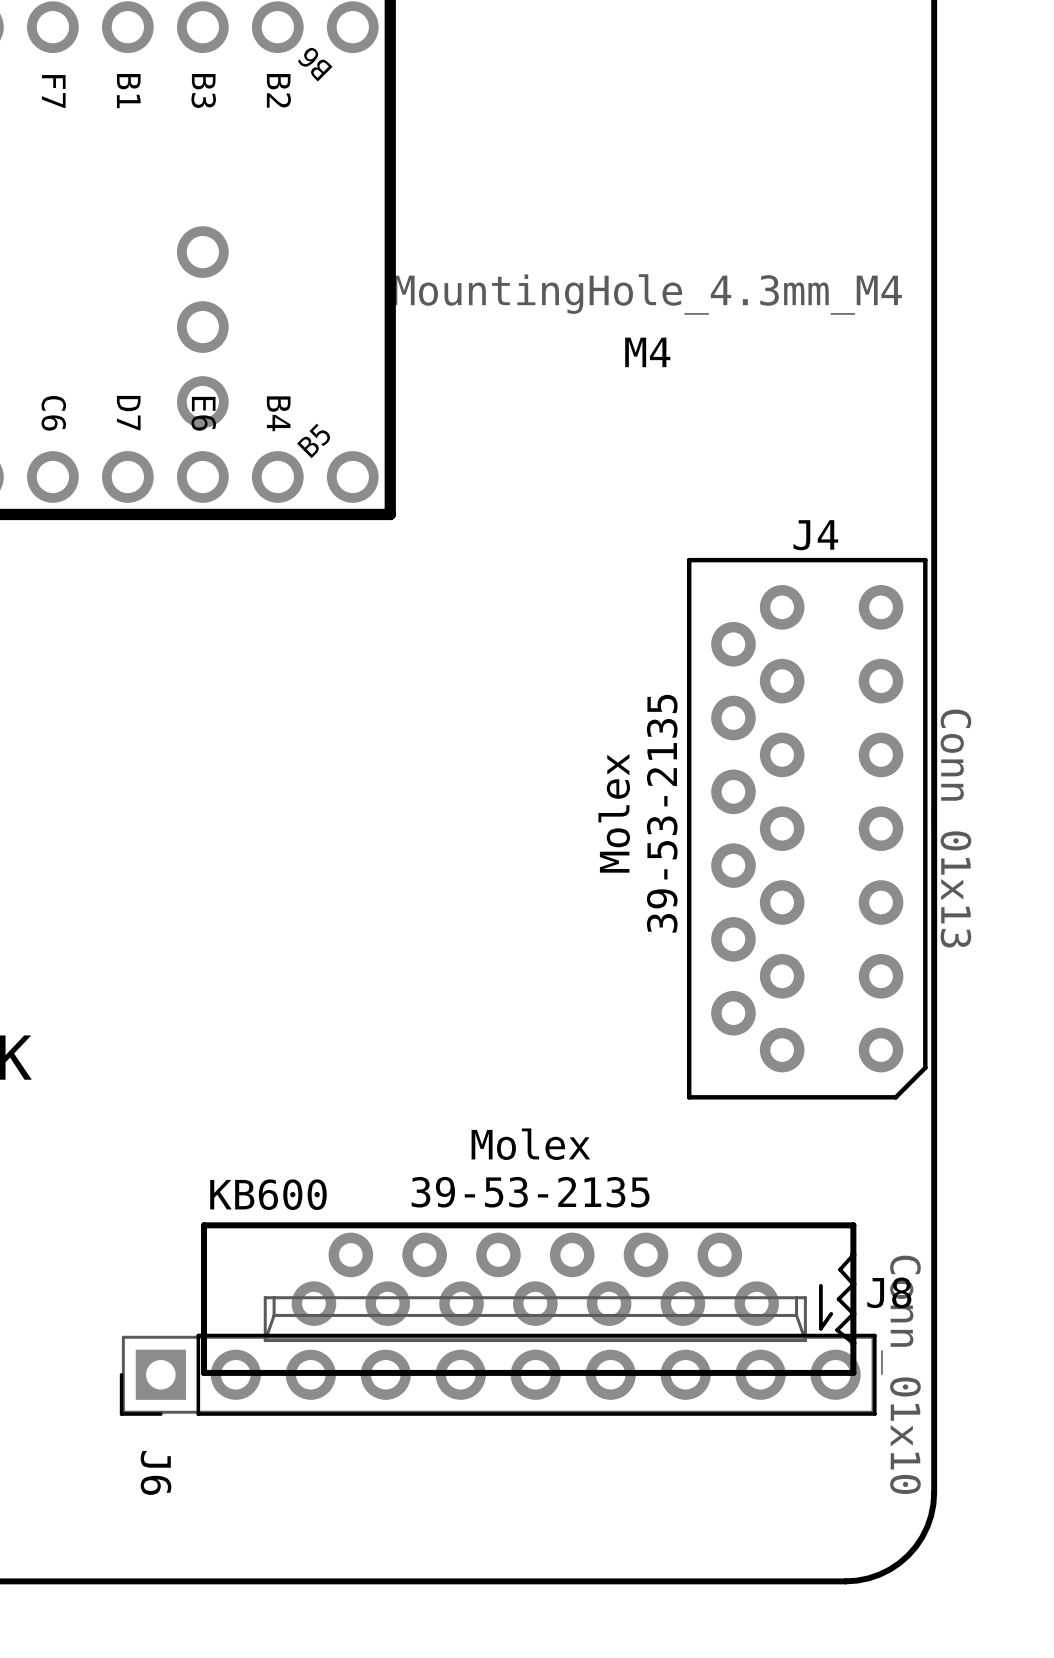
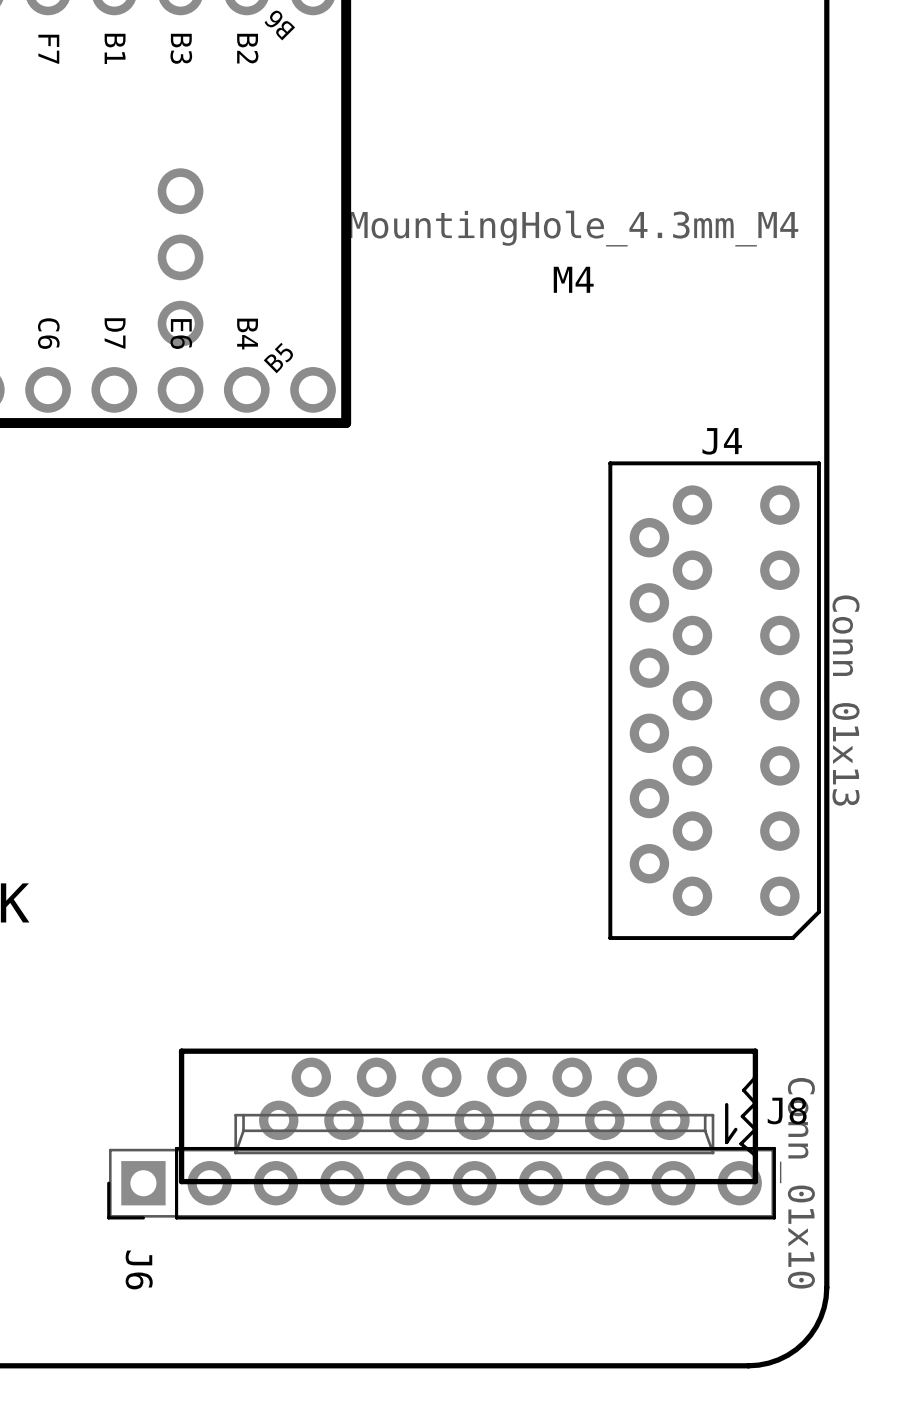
text: Molex (614, 813) -> none
text: 39-53-2135 (662, 813) -> none
text: Molex (530, 1144) -> none
text: 39-53-2135 (530, 1192) -> none
text: KB600 (268, 1194) -> none

